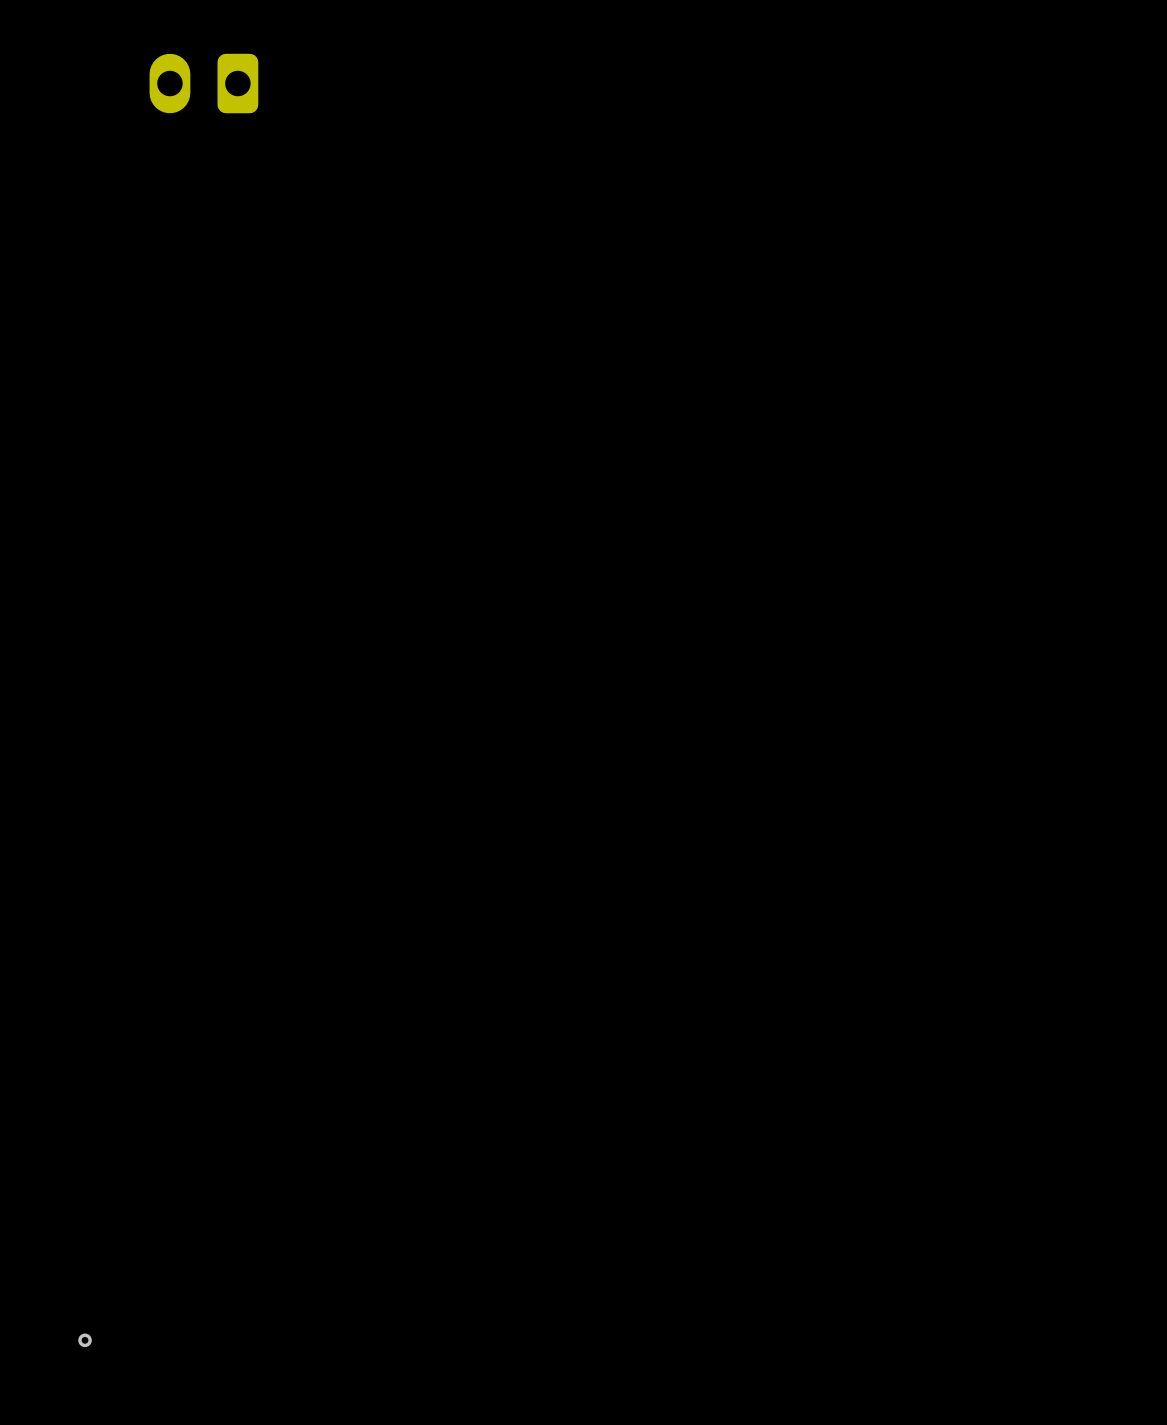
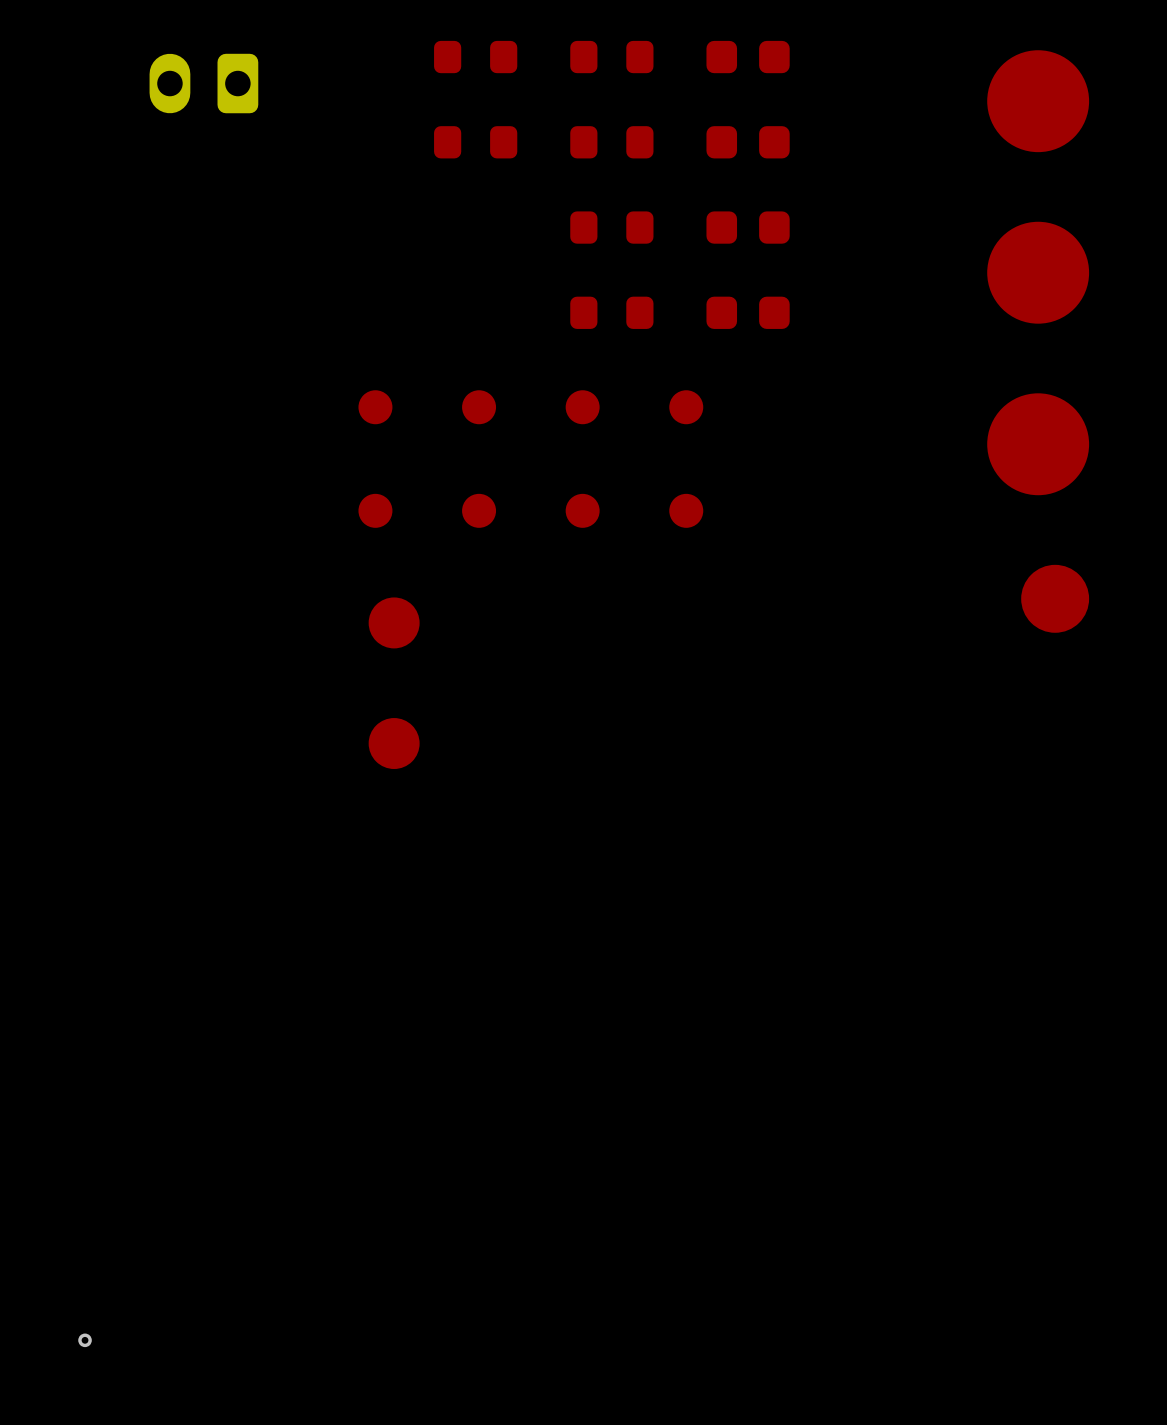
part: none -> (475, 57)
part: none -> (611, 57)
part: none -> (748, 57)
part: none -> (1038, 101)
part: none -> (475, 142)
part: none -> (611, 142)
part: none -> (748, 142)
part: none -> (611, 227)
part: none -> (748, 227)
part: none -> (1038, 272)
part: none -> (611, 312)
part: none -> (748, 312)
part: none -> (375, 407)
part: none -> (479, 407)
part: none -> (582, 407)
part: none -> (686, 407)
part: none -> (1038, 444)
part: none -> (375, 510)
part: none -> (479, 510)
part: none -> (582, 510)
part: none -> (686, 510)
part: none -> (1055, 598)
part: none -> (394, 622)
part: none -> (394, 743)

